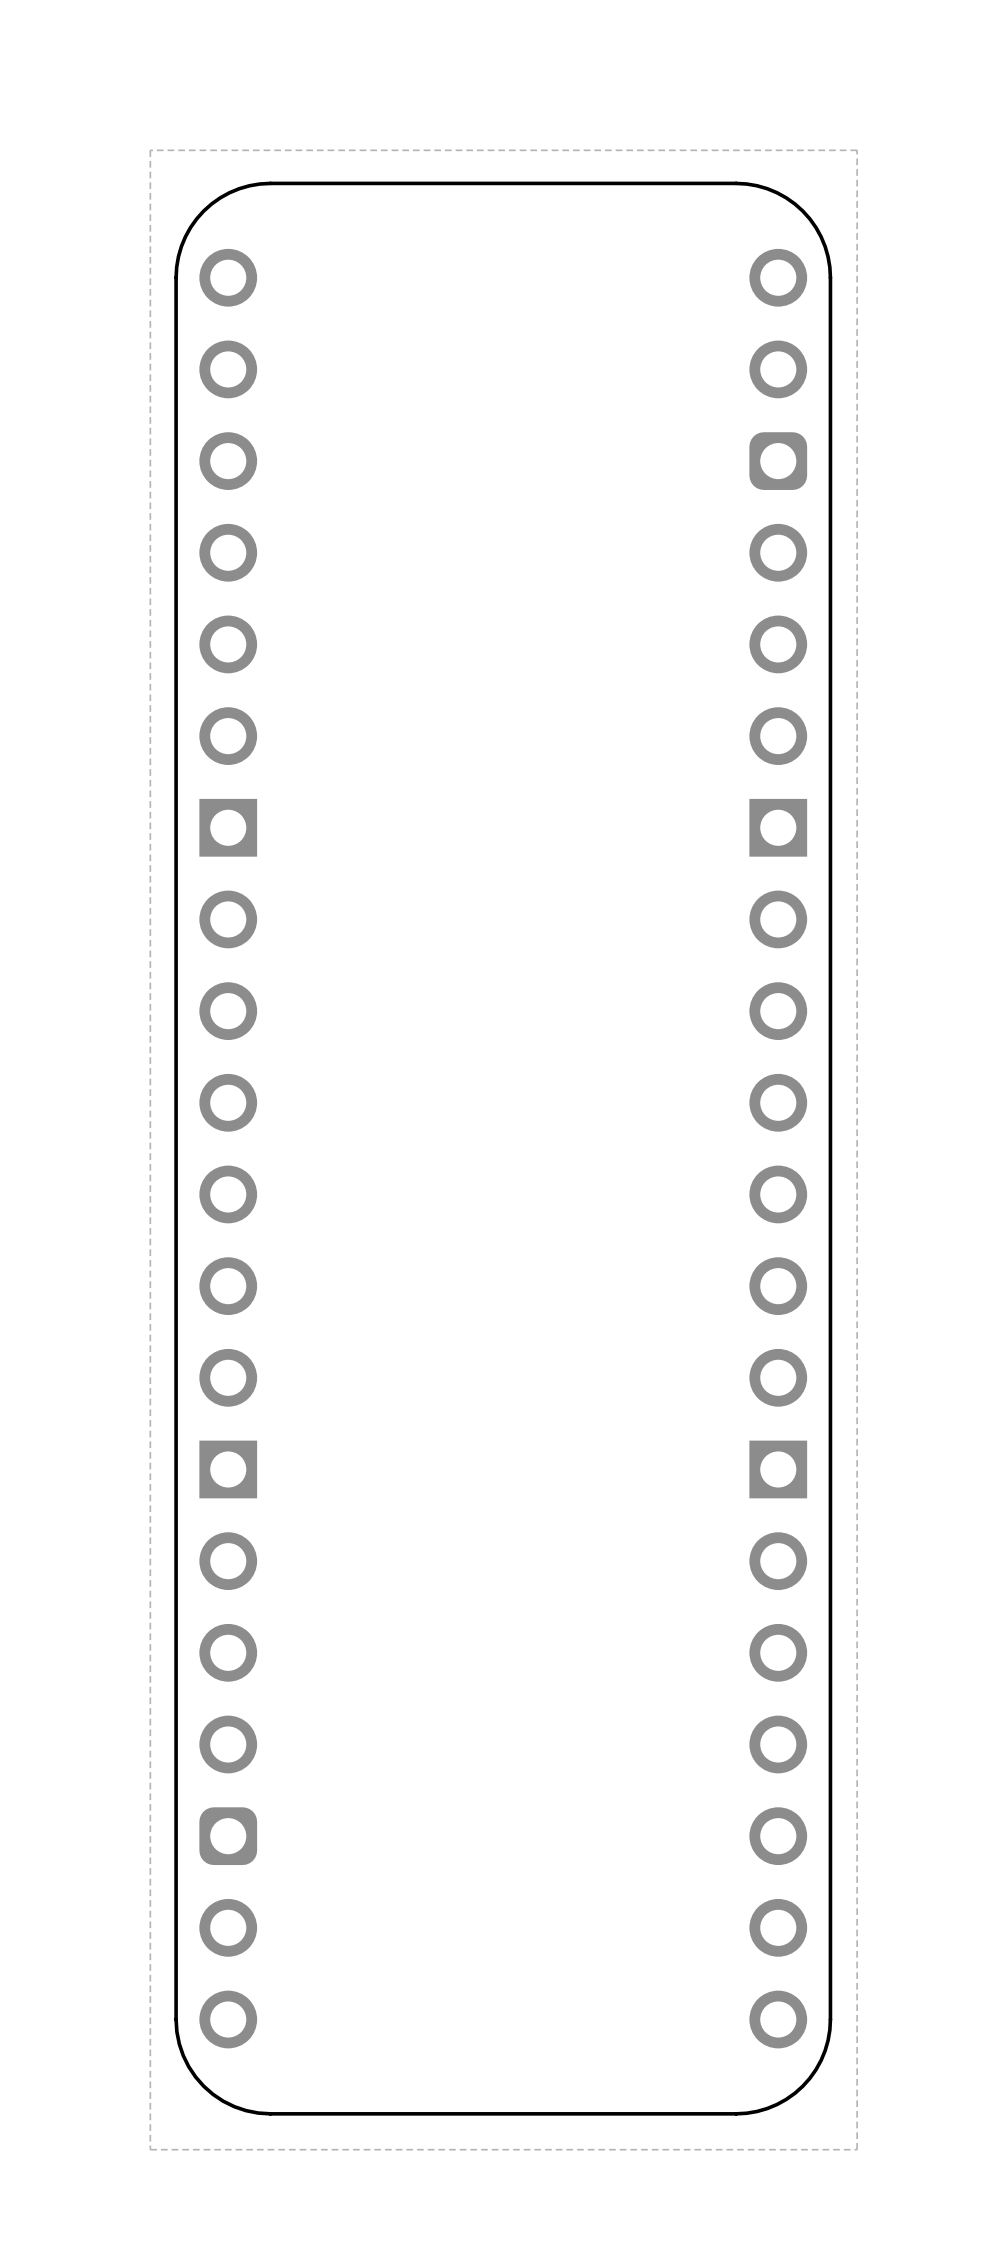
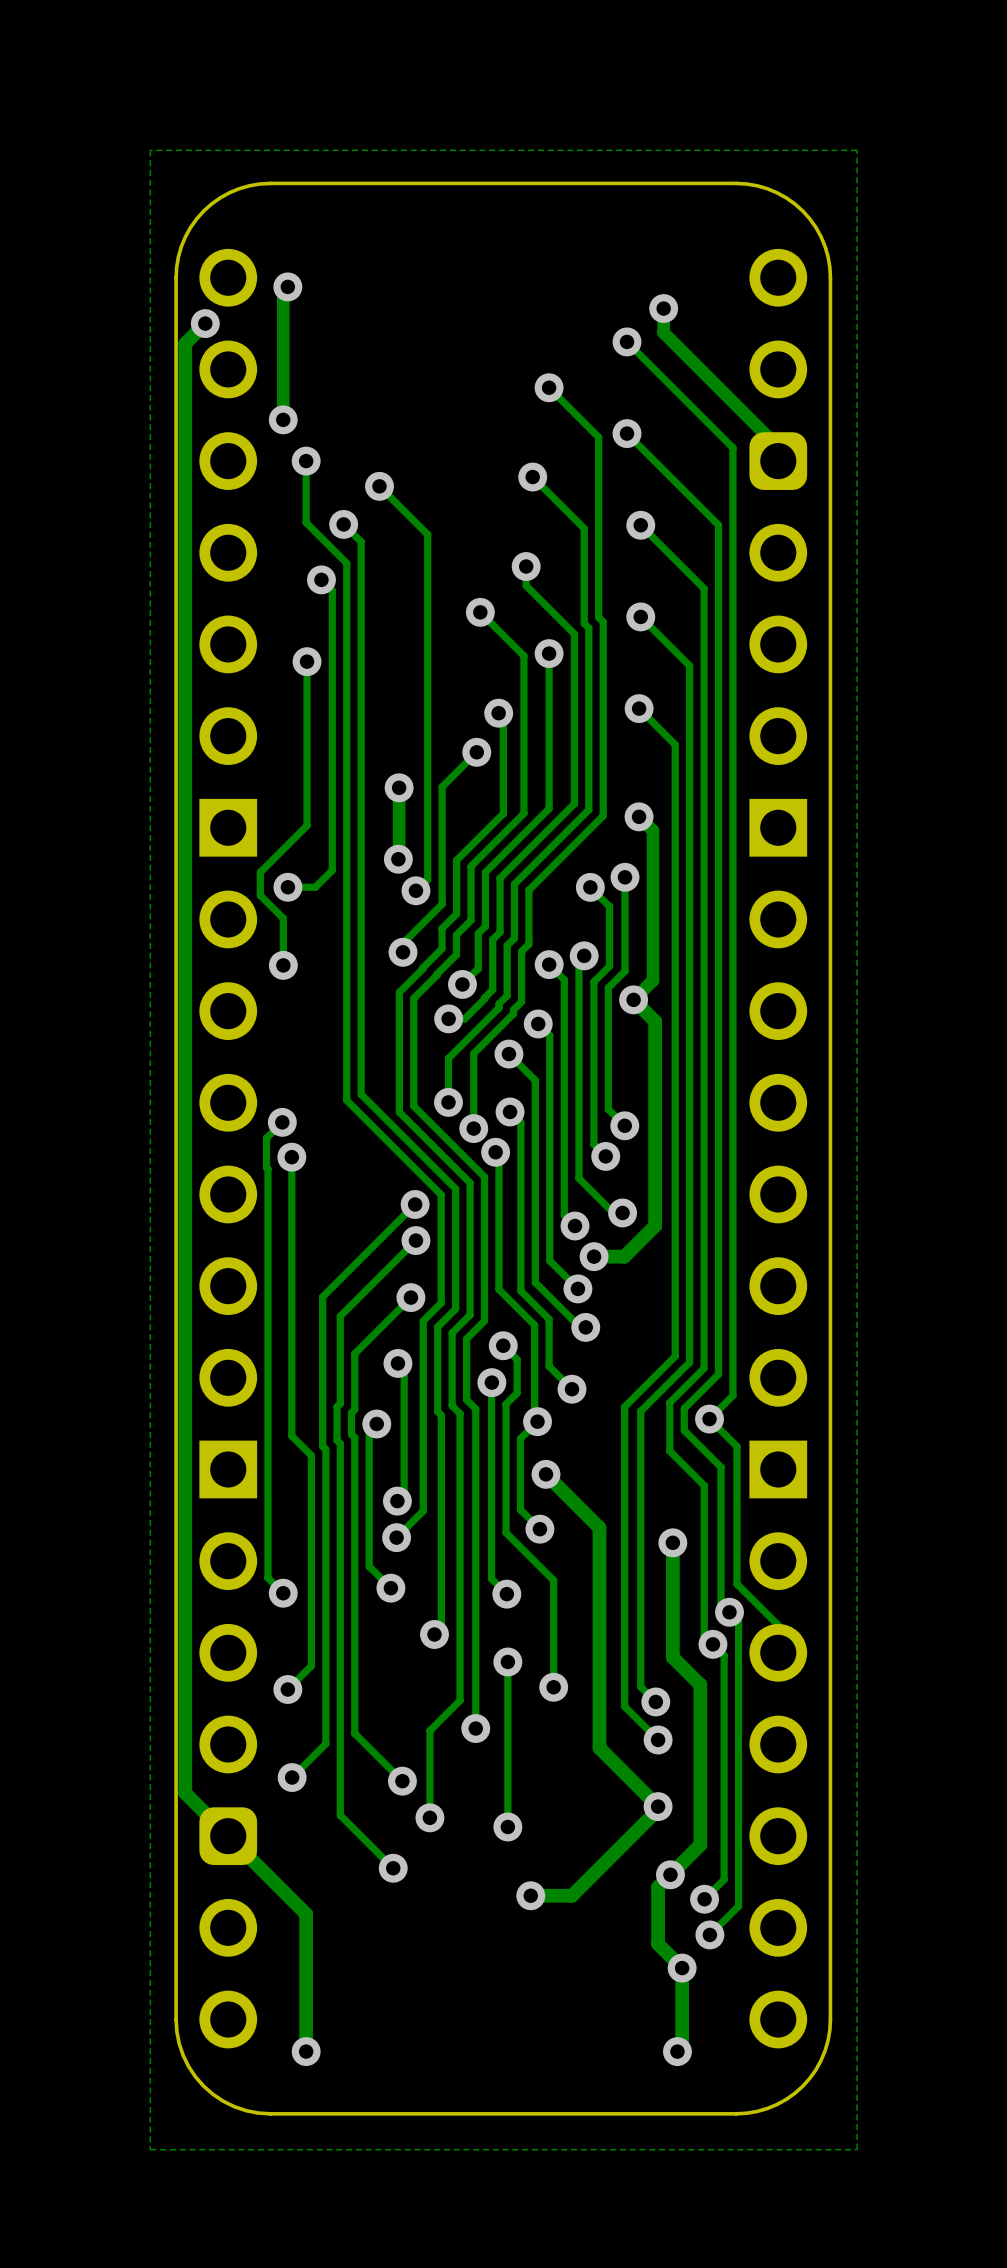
track: none -> (287, 286) (283, 291) (283, 419)
via: none -> (287, 286)
track: none -> (663, 308) (663, 332) (778, 447)
via: none -> (663, 308)
track: none -> (205, 323) (185, 343) (185, 1793) (306, 1914) (306, 2051)
via: none -> (205, 323)
track: none -> (627, 341) (732, 447) (732, 1395) (709, 1419) (737, 1446) (737, 1584) (778, 1625) (778, 1652)
via: none -> (627, 341)
track: none -> (549, 387) (598, 437) (598, 617) (603, 622) (603, 815) (528, 890) (528, 944) (521, 951) (521, 1001) (513, 1009) (513, 1013) (473, 1053) (473, 1128)
via: none -> (549, 387)
via: none -> (283, 419)
track: none -> (627, 433) (718, 525) (718, 1374) (684, 1408) (684, 1430) (721, 1467) (721, 1603) (738, 1621) (738, 1906) (709, 1934)
via: none -> (627, 433)
track: none -> (306, 461) (306, 522) (346, 563) (346, 1100) (441, 1194) (441, 1303) (423, 1320) (423, 1510) (396, 1537)
via: none -> (306, 461)
track: none -> (532, 477) (584, 528) (584, 623) (588, 627) (588, 809) (514, 884) (514, 938) (507, 945) (507, 995) (499, 1003) (499, 1007) (448, 1058) (448, 1102)
via: none -> (532, 477)
track: none -> (379, 486) (427, 534) (427, 879) (416, 890)
via: none -> (379, 486)
track: none -> (343, 524) (361, 541) (361, 1094) (455, 1188) (455, 1309) (437, 1326) (437, 1411) (441, 1415) (441, 1627) (434, 1634)
via: none -> (343, 524)
track: none -> (640, 525) (704, 588) (704, 1368) (669, 1402) (669, 1451) (704, 1485) (704, 1635) (724, 1655) (724, 1879) (704, 1899)
via: none -> (640, 525)
track: none -> (526, 566) (526, 585) (574, 633) (574, 803) (500, 878) (500, 932) (492, 939) (492, 989) (464, 1018) (448, 1018)
via: none -> (526, 566)
track: none -> (321, 579) (332, 590) (332, 870) (315, 887) (287, 887)
via: none -> (321, 579)
track: none -> (480, 612) (523, 655) (523, 813) (471, 866) (471, 920) (456, 935) (456, 954) (413, 998) (413, 1106) (484, 1176) (484, 1320) (466, 1338) (466, 1399) (475, 1408) (475, 1728)
via: none -> (480, 612)
track: none -> (640, 616) (689, 665) (689, 1362) (640, 1411) (640, 1686) (655, 1701)
via: none -> (640, 616)
track: none -> (549, 653) (549, 808) (485, 872) (485, 926) (478, 933) (478, 968) (462, 984)
via: none -> (549, 653)
track: none -> (307, 661) (307, 825) (260, 872) (260, 895) (283, 918) (283, 965)
via: none -> (307, 661)
track: none -> (639, 708) (675, 744) (675, 1356) (624, 1406) (624, 1706) (658, 1739)
via: none -> (639, 708)
track: none -> (498, 713) (503, 717) (503, 813) (456, 860) (456, 914) (442, 928) (442, 948) (399, 992) (399, 1112) (470, 1182) (470, 1315) (452, 1332) (452, 1405) (460, 1413) (460, 1700) (429, 1730) (429, 1817)
via: none -> (498, 713)
track: none -> (476, 752) (442, 786) (442, 904) (402, 943) (402, 952)
via: none -> (476, 752)
track: none -> (399, 787) (398, 859)
via: none -> (399, 787)
track: none -> (639, 816) (652, 830) (652, 980) (633, 999) (655, 1021) (655, 1225) (624, 1256) (594, 1256)
via: none -> (639, 816)
via: none -> (398, 859)
track: none -> (625, 877) (625, 971) (608, 987) (608, 1109) (624, 1125)
via: none -> (625, 877)
via: none -> (287, 887)
track: none -> (590, 887) (609, 906) (609, 966) (593, 981) (593, 1144) (605, 1156)
via: none -> (590, 887)
via: none -> (415, 890)
via: none -> (402, 952)
track: none -> (584, 955) (578, 961) (578, 1178) (613, 1212) (622, 1212)
via: none -> (584, 955)
track: none -> (549, 964) (564, 979) (564, 1215) (575, 1226)
via: none -> (549, 964)
via: none -> (283, 965)
via: none -> (462, 984)
via: none -> (633, 999)
via: none -> (448, 1018)
track: none -> (538, 1023) (549, 1035) (549, 1260) (577, 1288)
via: none -> (538, 1023)
track: none -> (508, 1054) (535, 1080) (535, 1282) (580, 1327) (585, 1327)
via: none -> (508, 1054)
via: none -> (448, 1102)
track: none -> (510, 1111) (520, 1122) (520, 1290) (549, 1319) (549, 1366) (572, 1389)
via: none -> (510, 1111)
track: none -> (282, 1122) (266, 1138) (266, 1167) (267, 1577) (283, 1593)
via: none -> (282, 1122)
via: none -> (624, 1125)
via: none -> (473, 1128)
track: none -> (495, 1152) (498, 1155) (498, 1289) (534, 1325) (534, 1418) (537, 1421) (520, 1438) (520, 1509) (539, 1529)
via: none -> (495, 1152)
via: none -> (605, 1156)
track: none -> (291, 1157) (291, 1436) (311, 1455) (311, 1665) (287, 1689)
via: none -> (291, 1157)
track: none -> (415, 1204) (322, 1296) (322, 1446) (325, 1449) (325, 1743) (292, 1777)
via: none -> (415, 1204)
via: none -> (622, 1212)
via: none -> (575, 1226)
track: none -> (415, 1240) (340, 1316) (340, 1403) (337, 1406) (337, 1440) (340, 1443) (340, 1815) (393, 1868)
via: none -> (415, 1240)
via: none -> (594, 1256)
via: none -> (577, 1288)
track: none -> (410, 1297) (354, 1353) (354, 1409) (351, 1412) (351, 1434) (354, 1437) (354, 1733) (402, 1781)
via: none -> (410, 1297)
via: none -> (585, 1327)
track: none -> (503, 1345) (517, 1359) (517, 1393) (506, 1404) (506, 1532) (553, 1580) (553, 1687)
via: none -> (503, 1345)
track: none -> (397, 1363) (404, 1369) (404, 1494) (397, 1501)
via: none -> (397, 1363)
track: none -> (491, 1382) (491, 1578) (506, 1594)
via: none -> (491, 1382)
via: none -> (572, 1389)
via: none -> (709, 1419)
via: none -> (537, 1421)
track: none -> (376, 1423) (369, 1431) (369, 1566) (390, 1588)
via: none -> (376, 1423)
track: none -> (545, 1474) (599, 1527) (599, 1748) (658, 1806) (658, 1809) (572, 1895) (530, 1895)
via: none -> (545, 1474)
via: none -> (397, 1501)
via: none -> (539, 1529)
via: none -> (396, 1537)
track: none -> (672, 1542) (672, 1657) (700, 1684) (700, 1844) (658, 1887) (658, 1944) (682, 1968) (682, 2046) (677, 2051)
via: none -> (672, 1542)
via: none -> (390, 1588)
via: none -> (283, 1593)
via: none -> (506, 1594)
via: none -> (729, 1612)
via: none -> (434, 1634)
via: none -> (712, 1644)
track: none -> (507, 1661) (507, 1827)
via: none -> (507, 1661)
via: none -> (553, 1687)
via: none -> (287, 1689)
via: none -> (655, 1701)
via: none -> (475, 1728)
via: none -> (658, 1739)
via: none -> (292, 1777)
via: none -> (402, 1781)
via: none -> (658, 1806)
via: none -> (429, 1817)
via: none -> (507, 1827)
via: none -> (393, 1868)
via: none -> (670, 1874)
via: none -> (530, 1895)
via: none -> (704, 1899)
via: none -> (709, 1934)
via: none -> (682, 1968)
via: none -> (306, 2051)
via: none -> (677, 2051)

